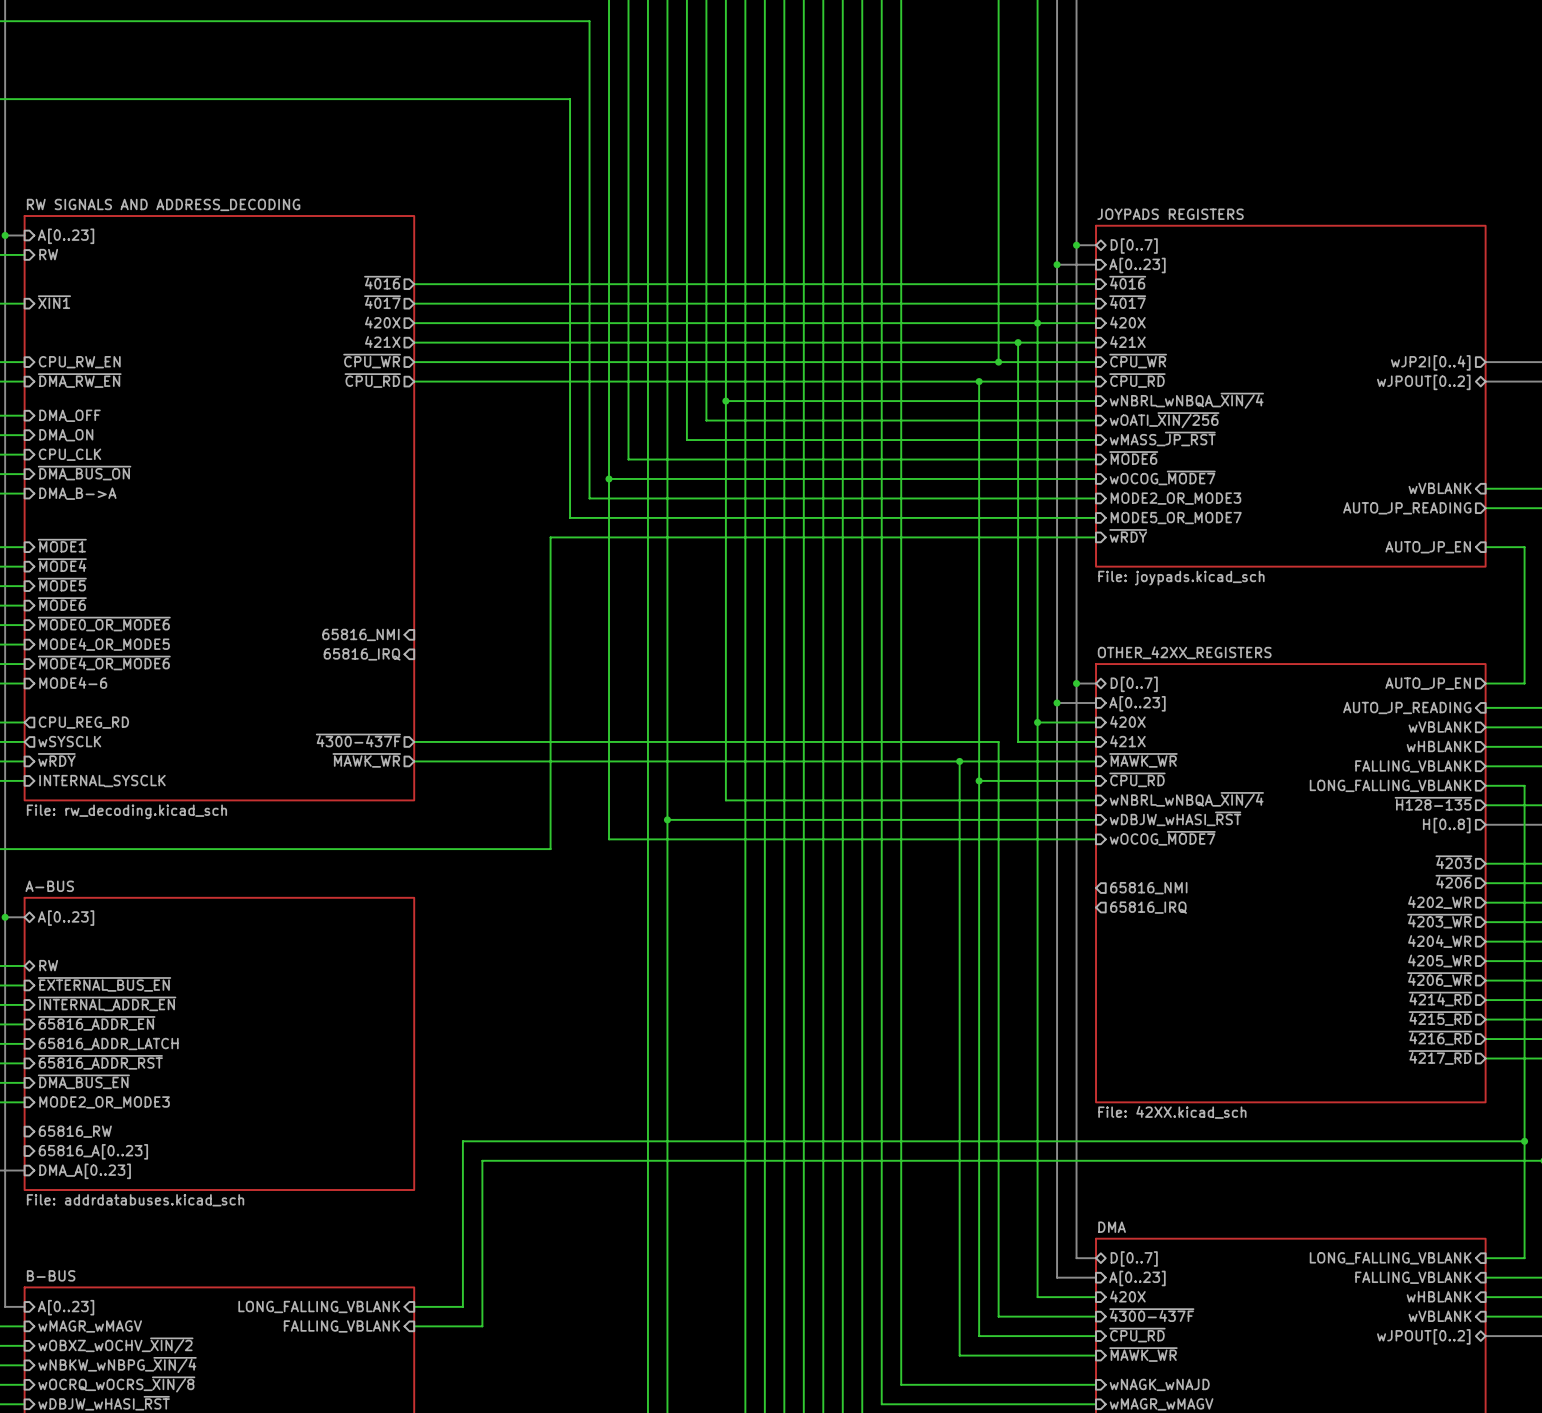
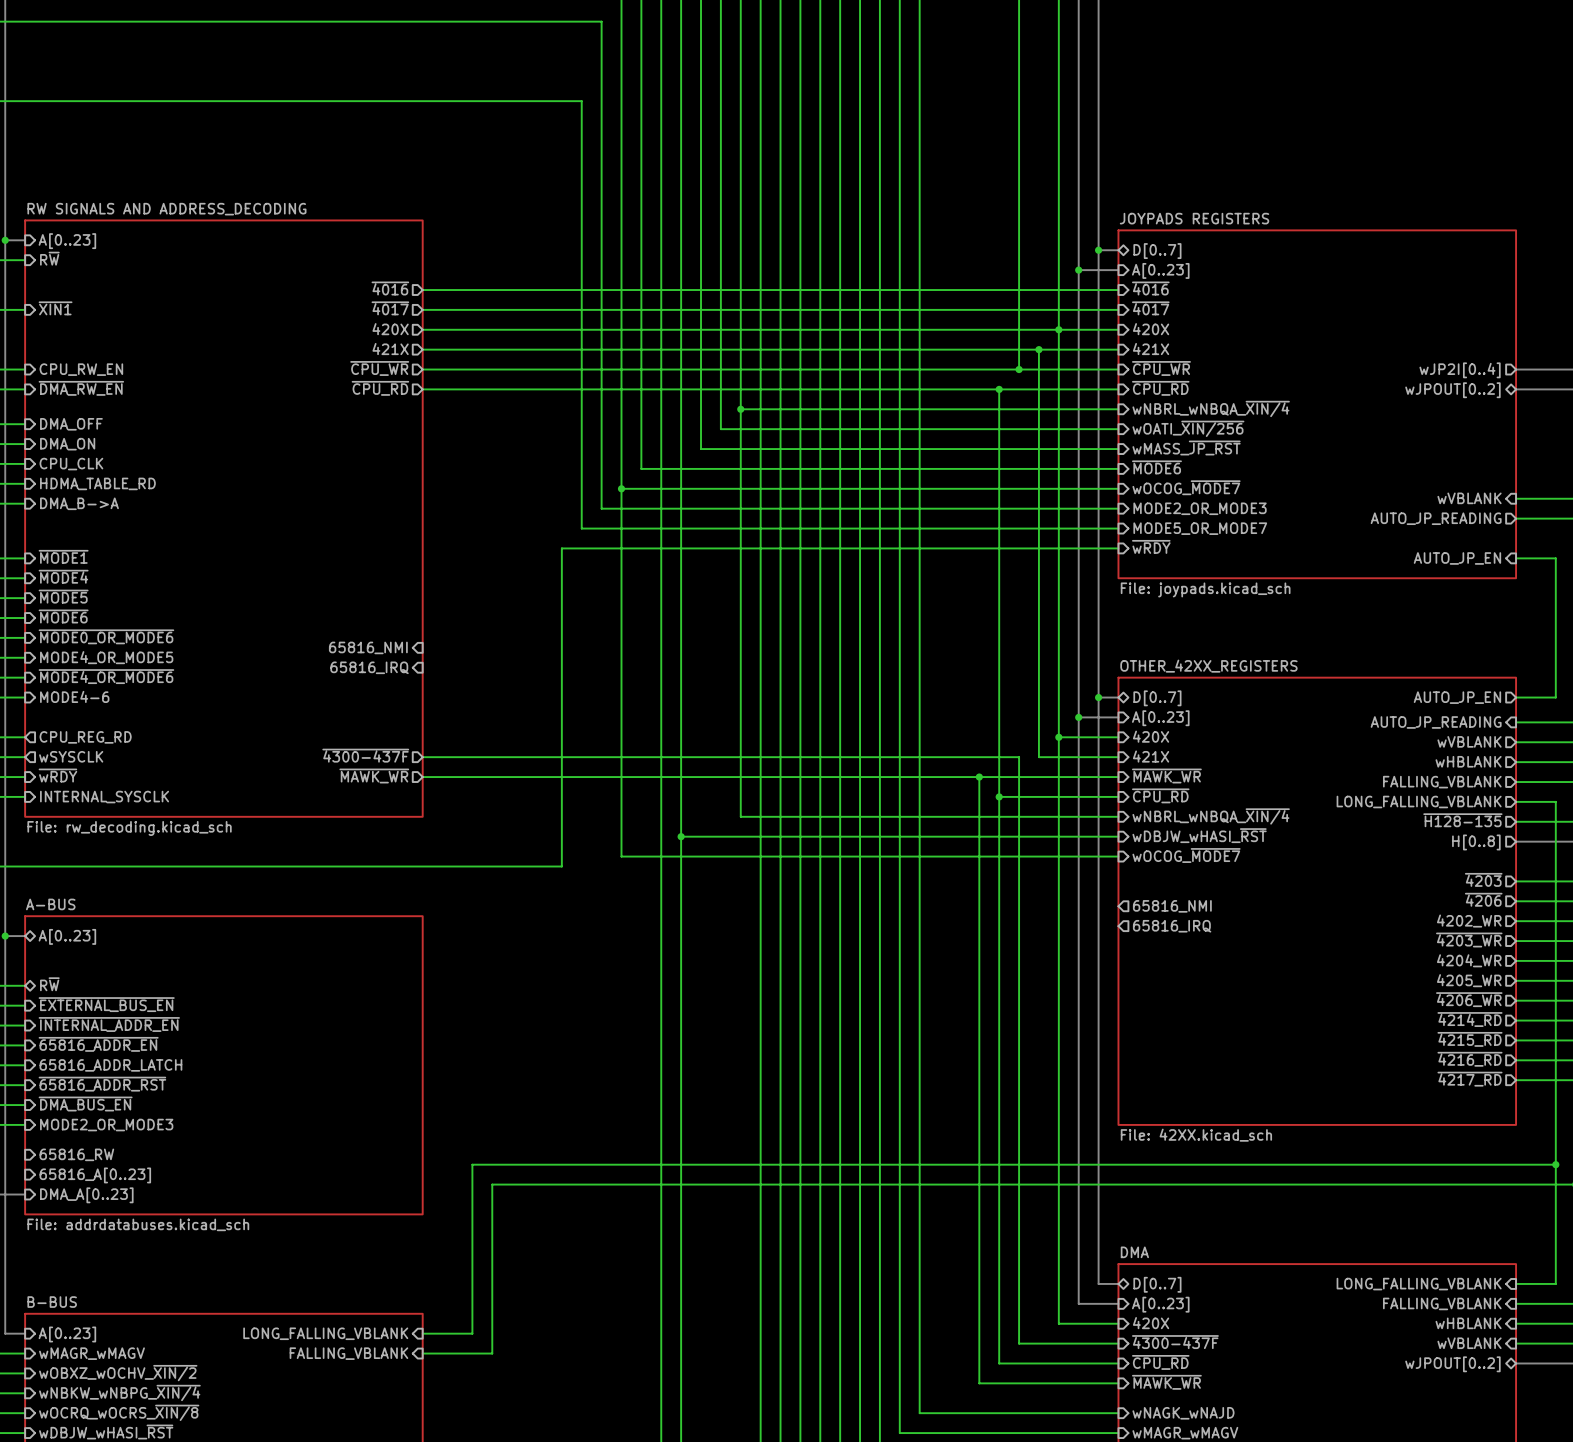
sheet pin: RW (48, 254) -> R~{W} (49, 258)
sheet pin: ~{DMA_BUS_ON} (84, 473) -> HDMA_TABLE_RD (97, 483)
sheet pin: RW (48, 965) -> R~{W} (49, 984)

